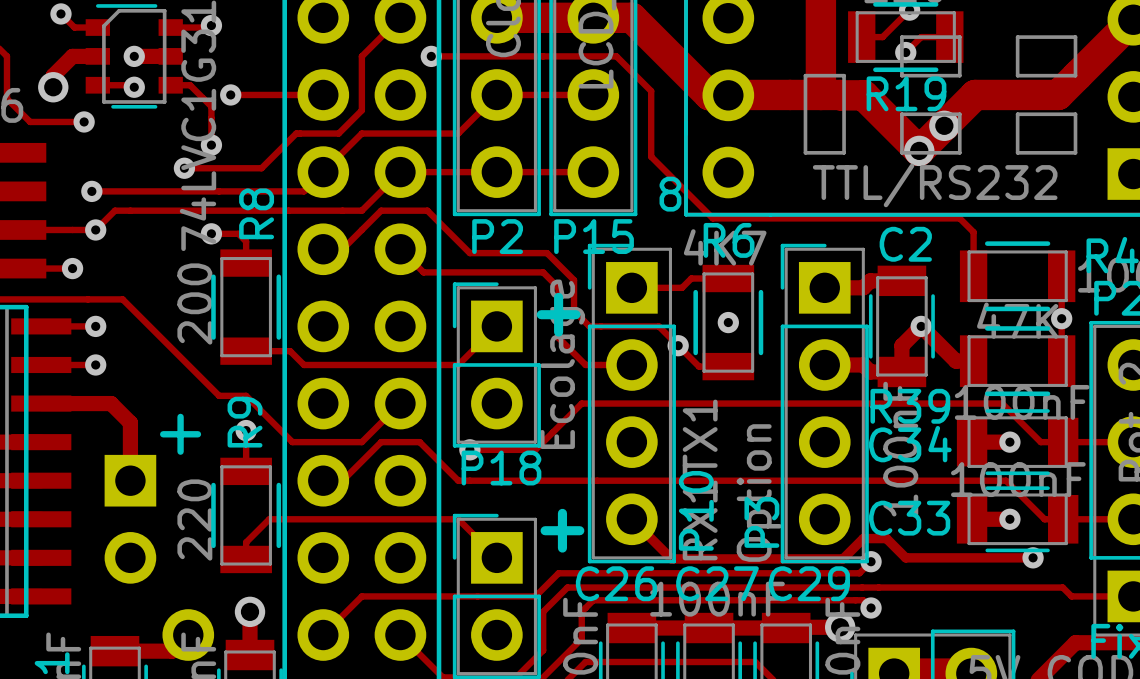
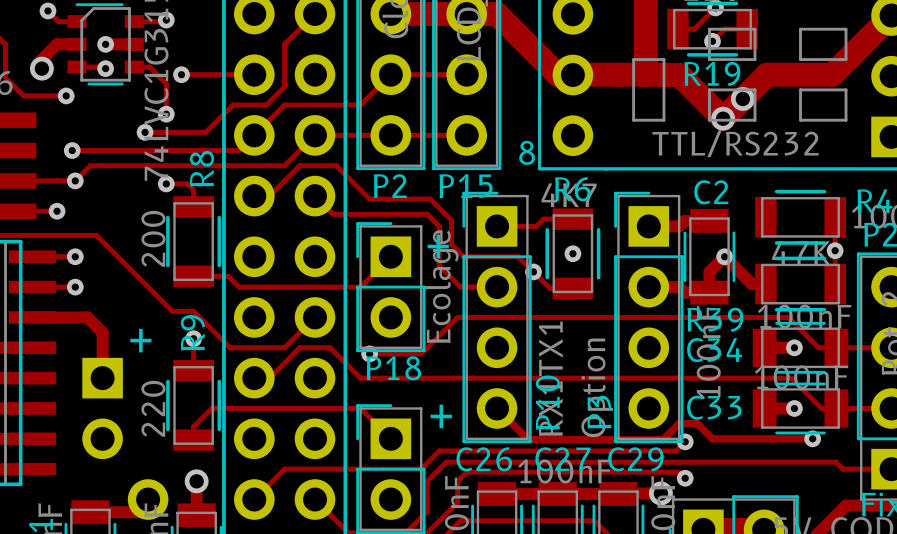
track: (431, 56) (616, 56) (651, 91) (651, 156) (712, 218) (959, 218) (973, 232) (973, 276) -> none
via: (431, 56) -> none

